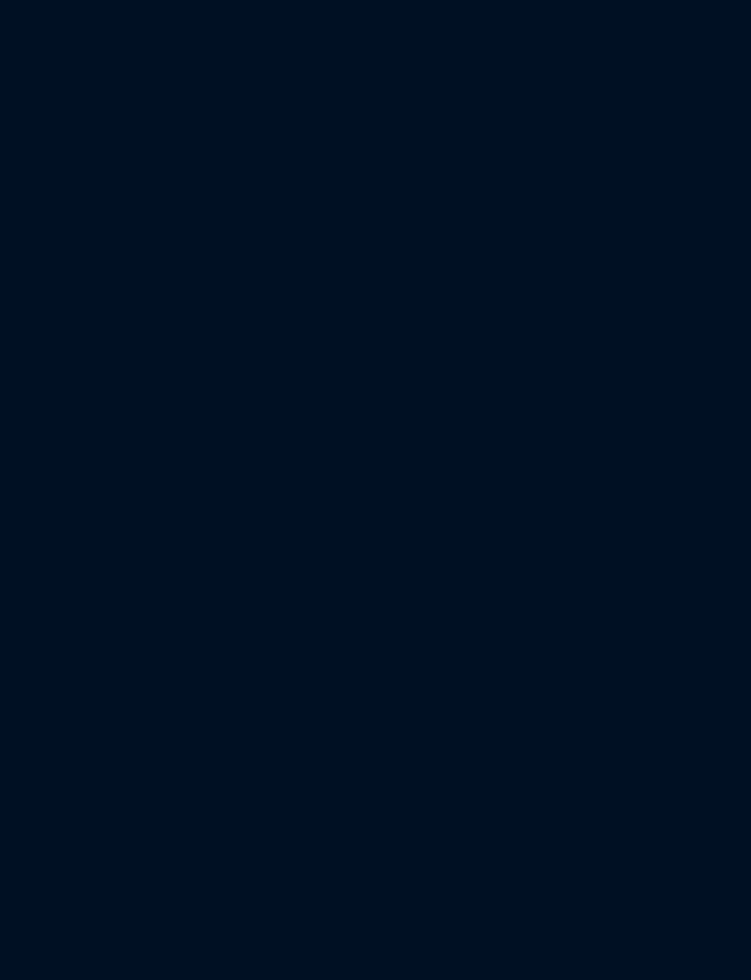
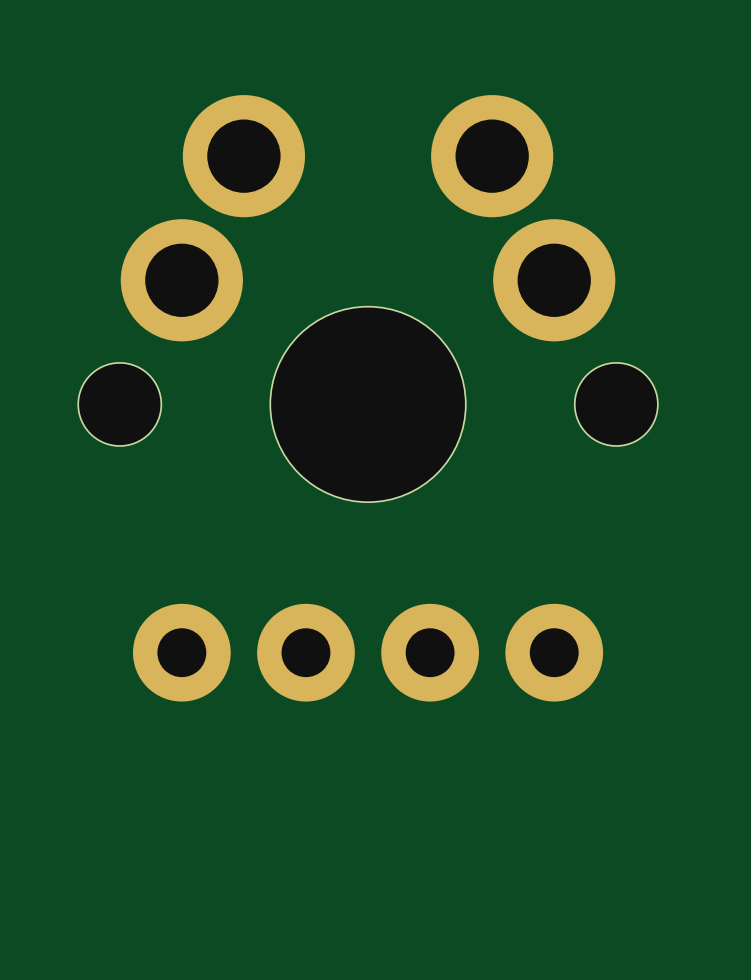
part: none -> (368, 398)

